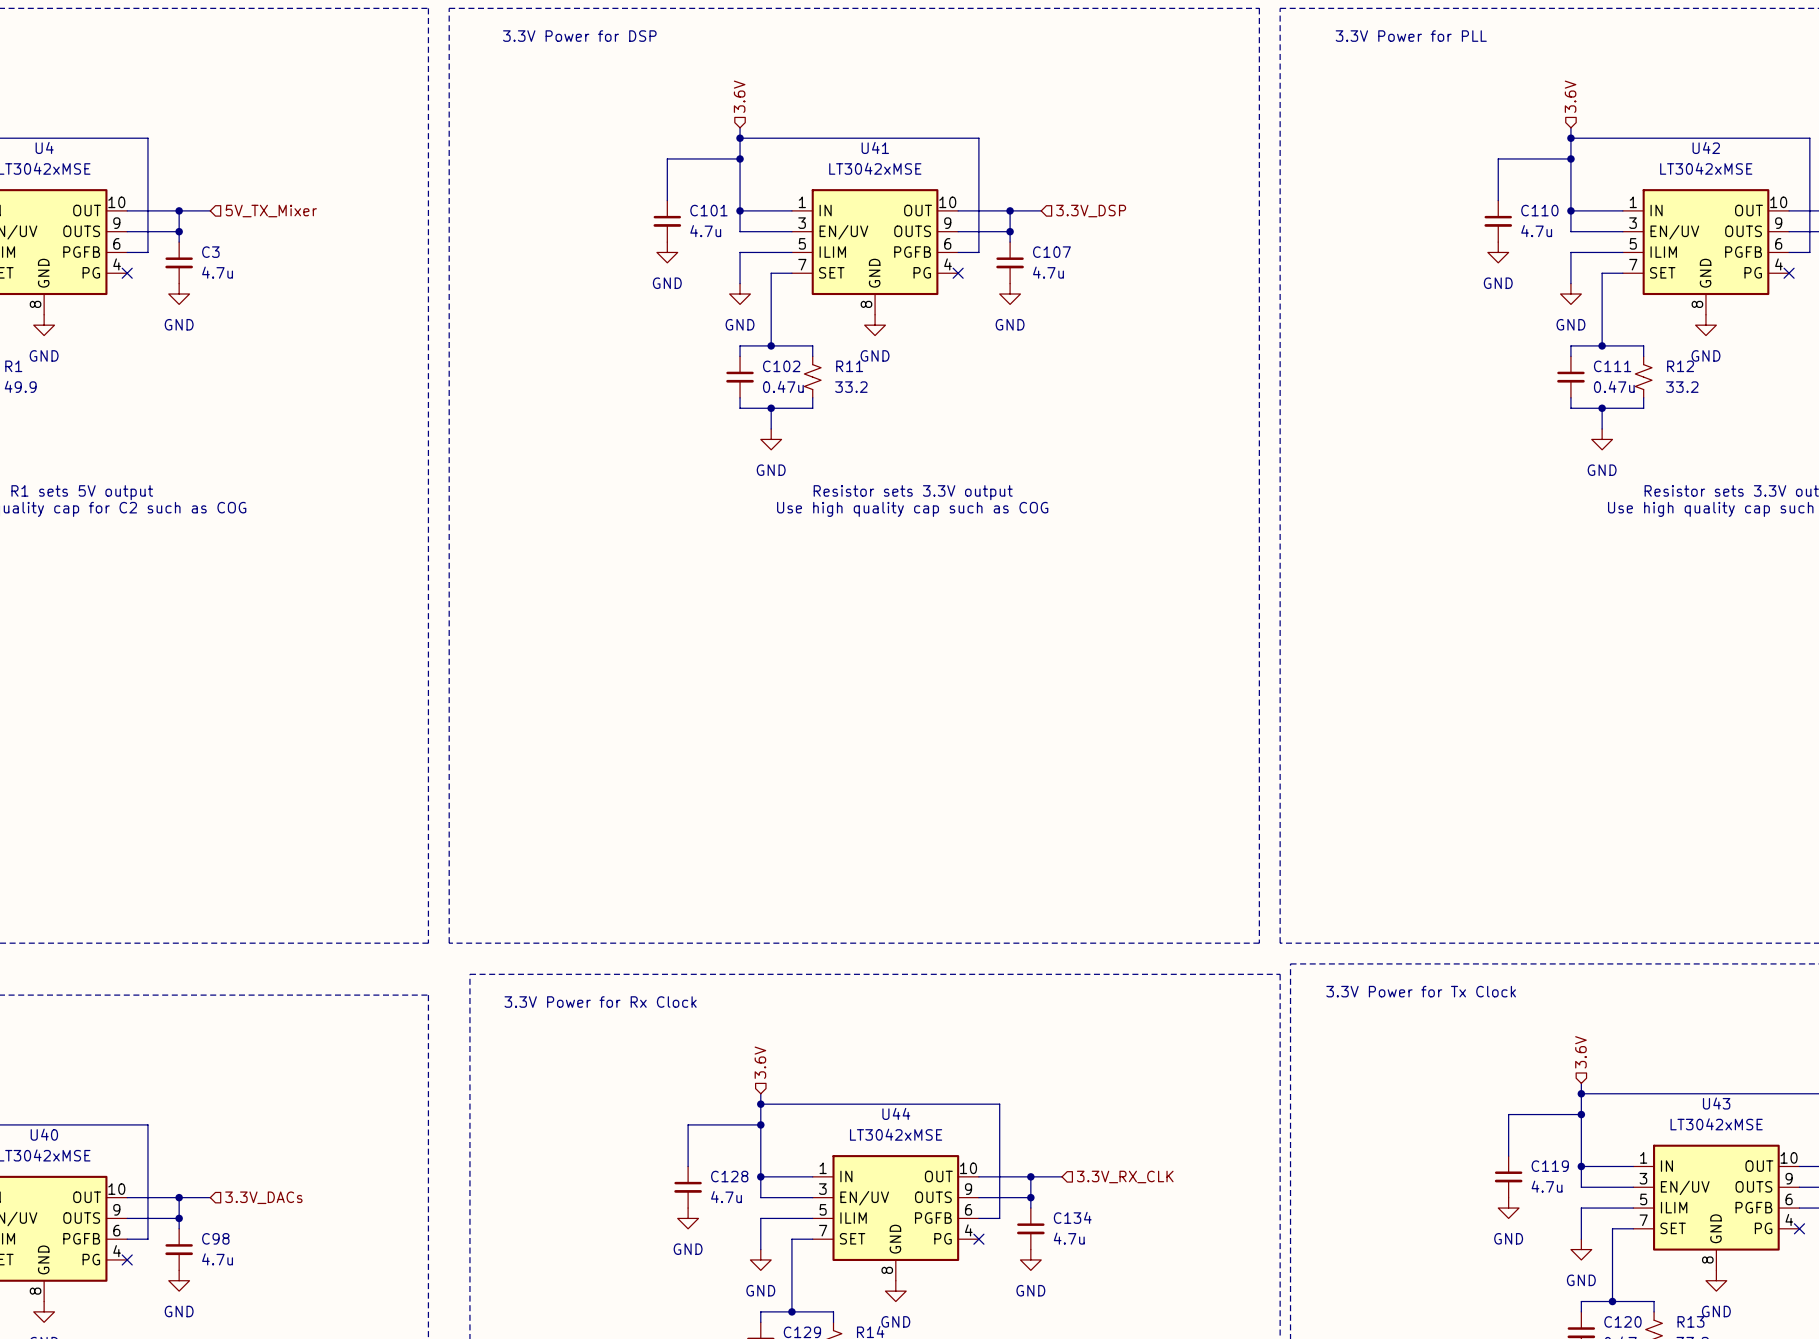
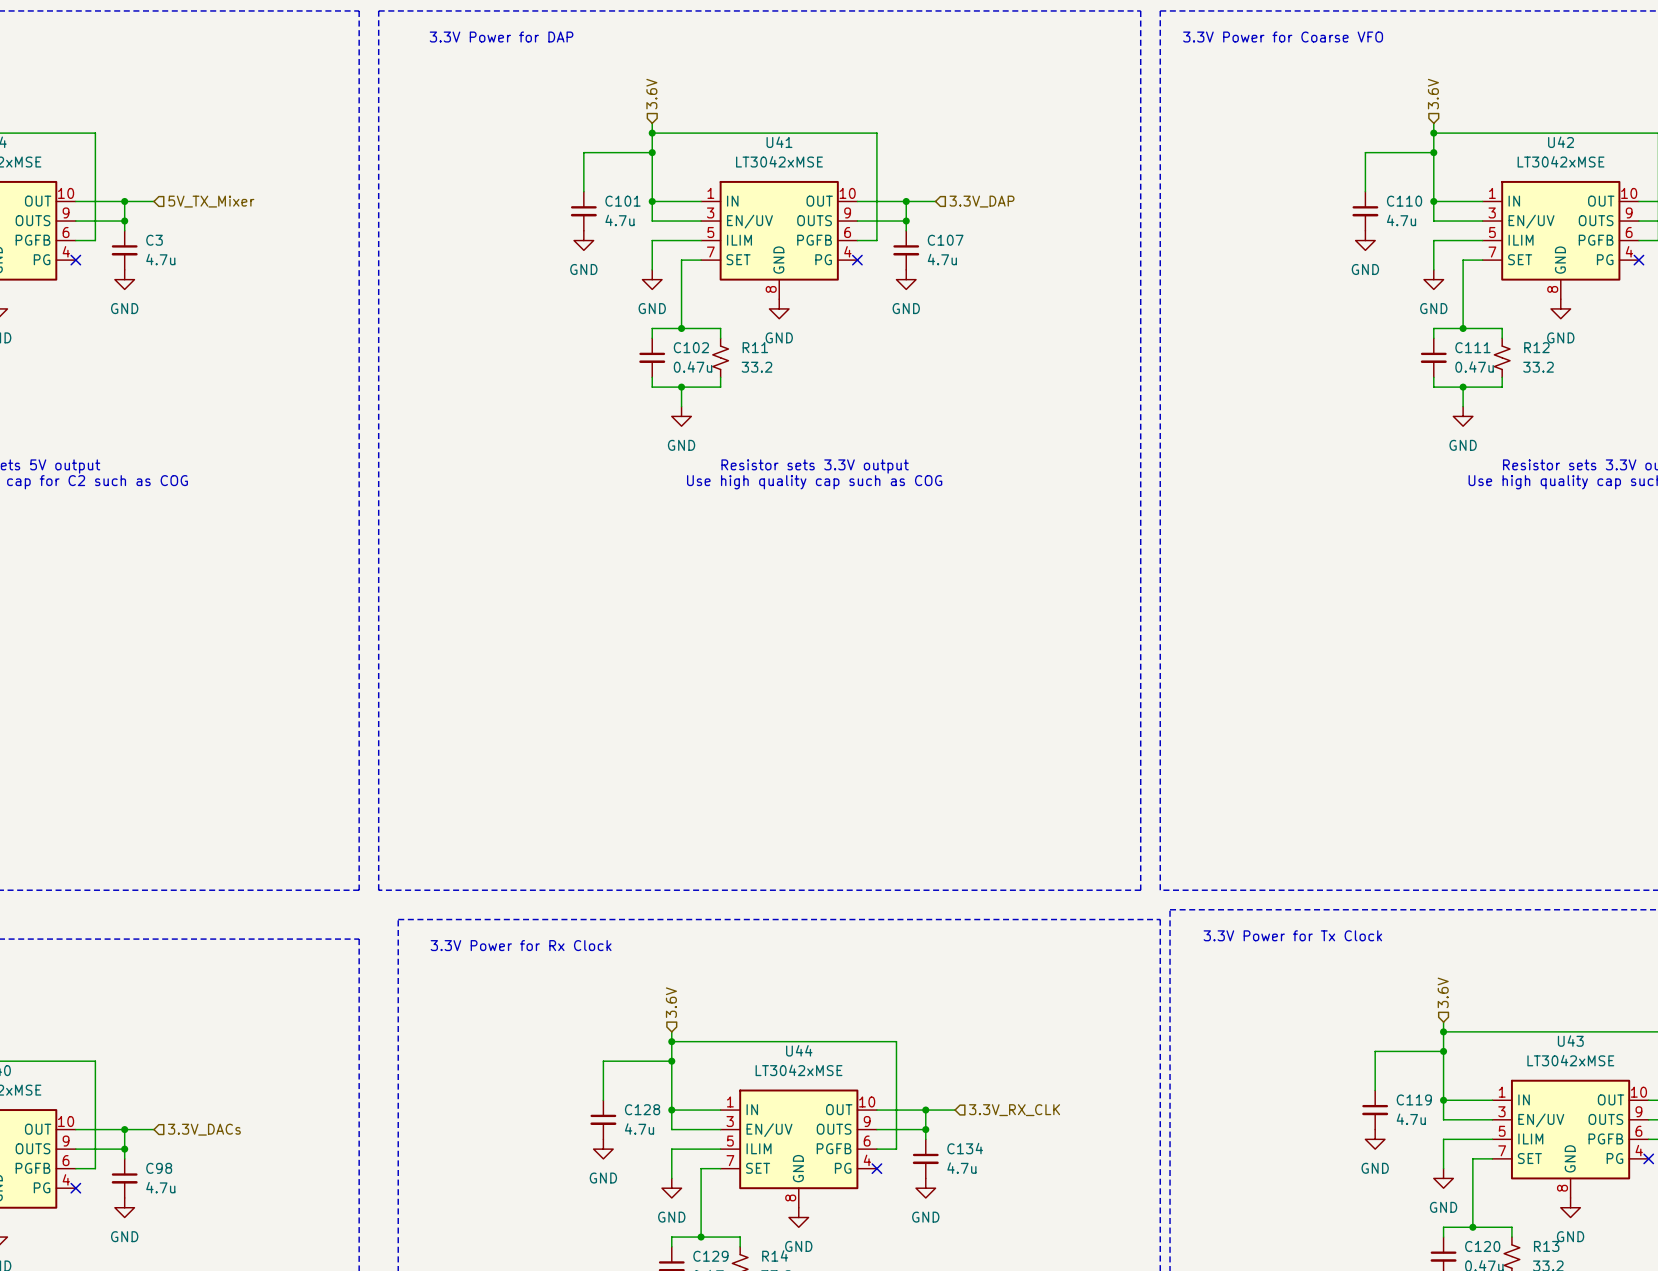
text: 3.3V Power for DSP (579, 36) -> 3.3V Power for DAP (501, 37)
text: 3.3V Power for PLL (1411, 36) -> 3.3V Power for Coarse VFO (1283, 37)
hierarchical label: 3.3V_DSP (1091, 211) -> 3.3V_DAP (981, 201)

